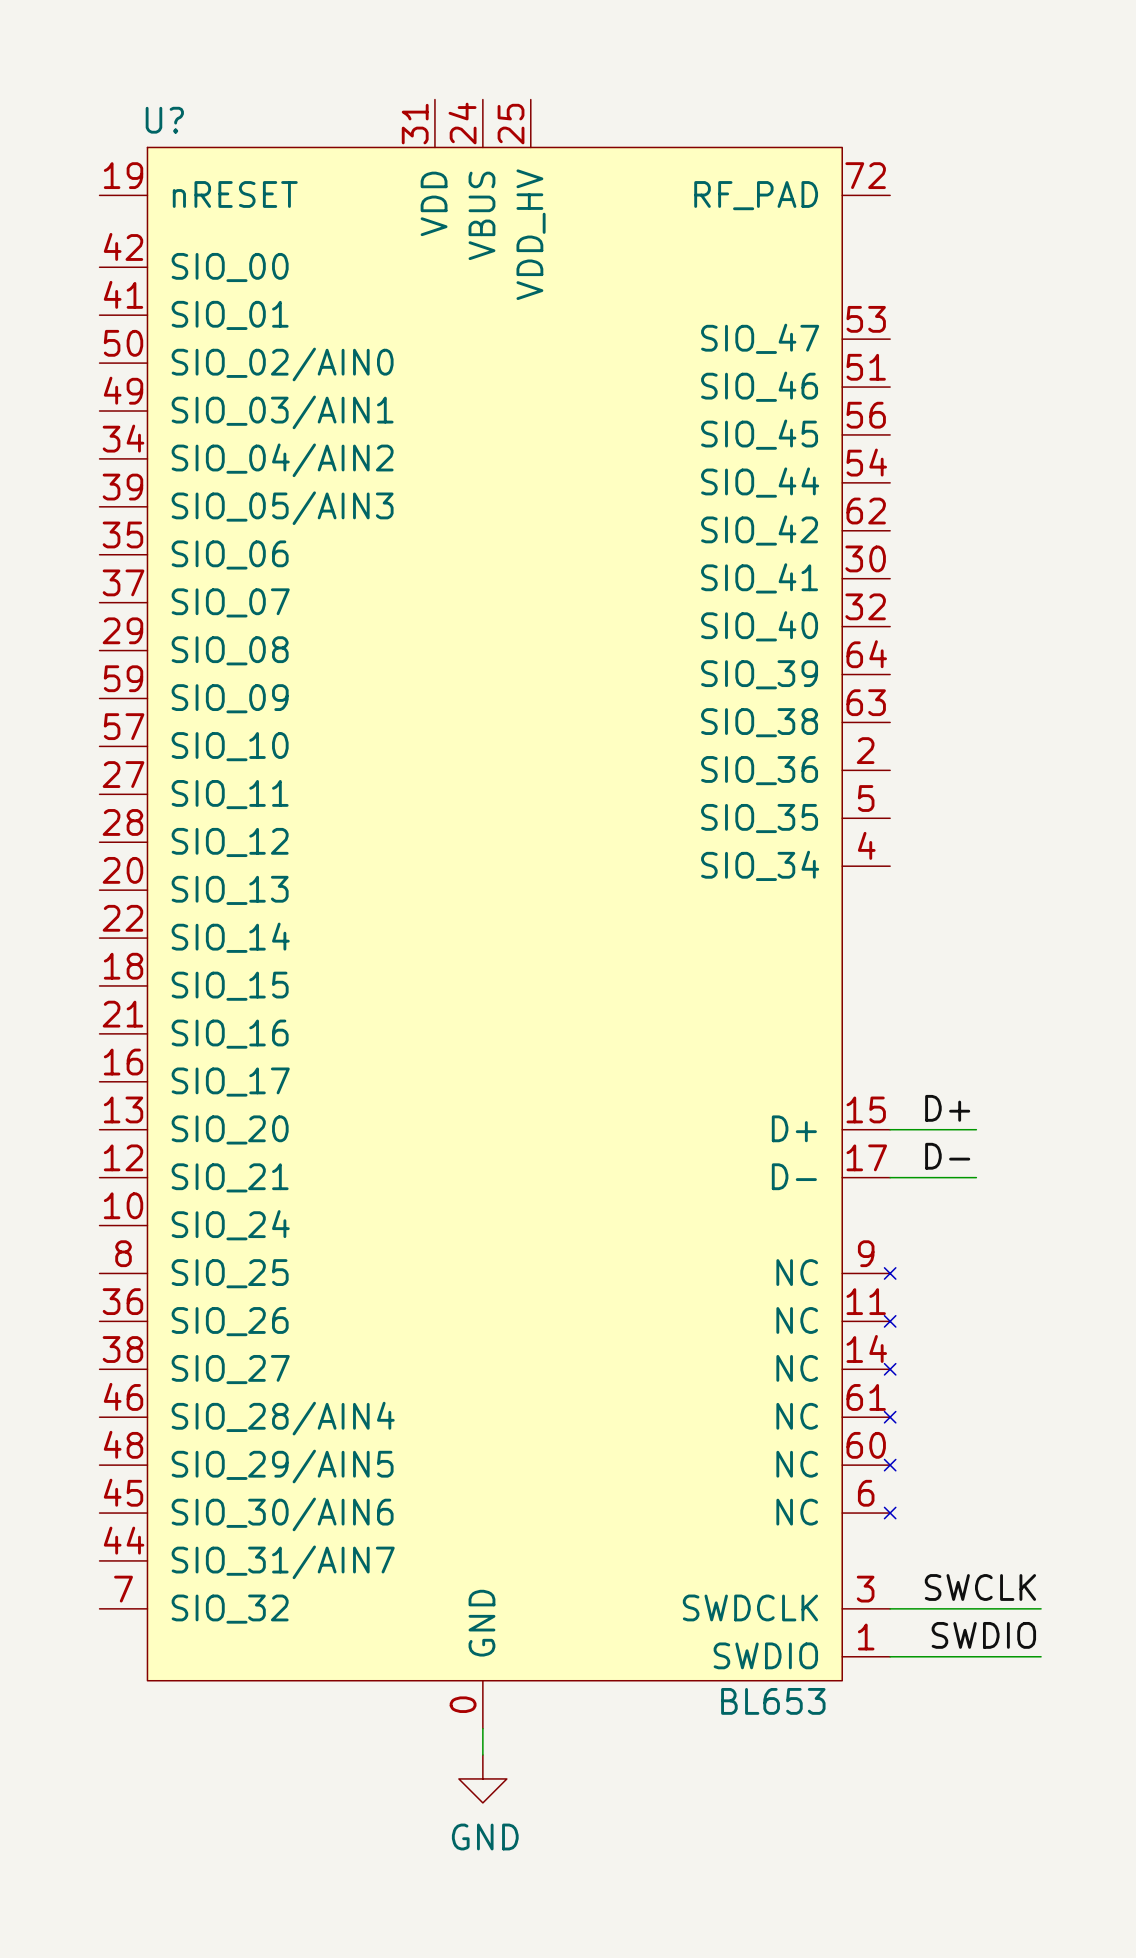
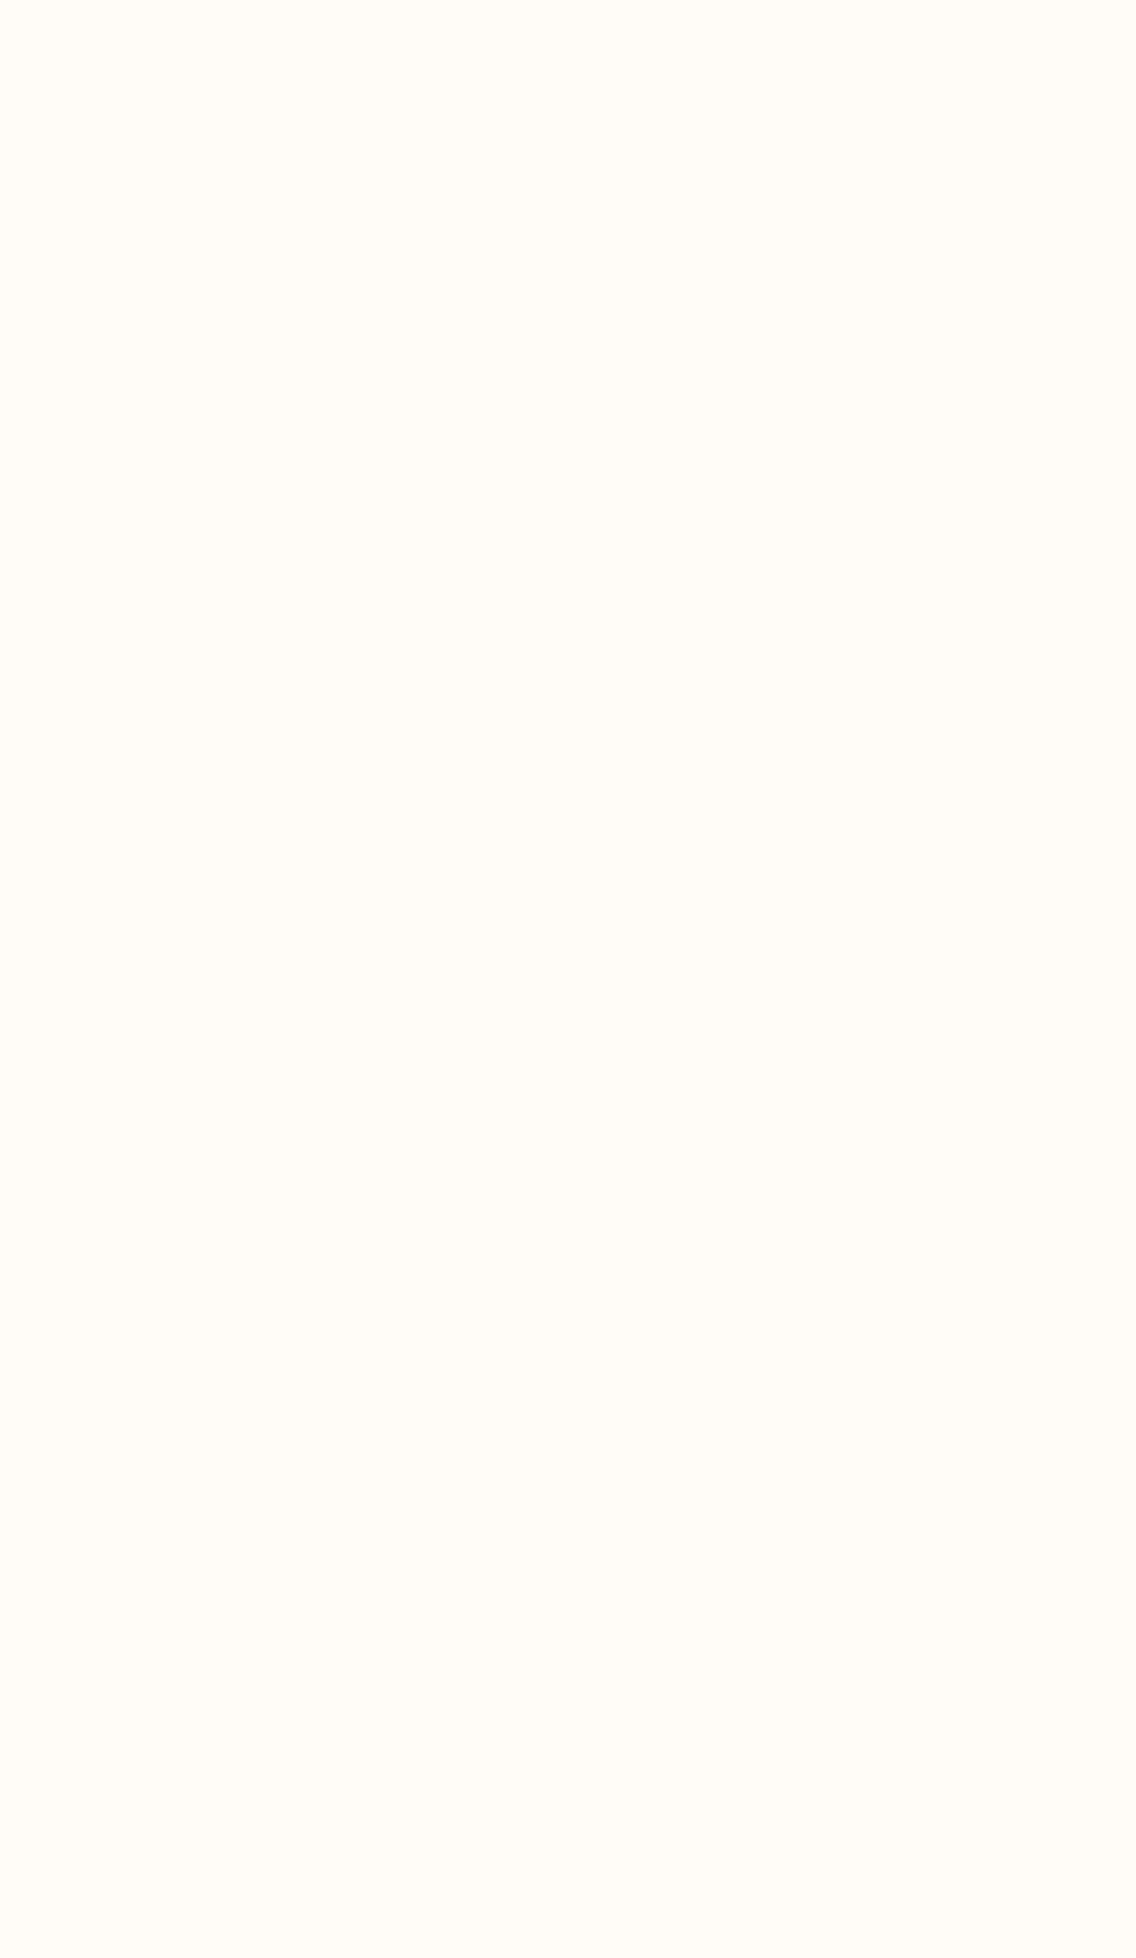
U?: BL653 (497, 914) -> none
label: D+ (947, 1108) -> none
wire: (890, 1129) (976, 1129) -> none
label: D- (947, 1156) -> none
wire: (890, 1177) (976, 1177) -> none
label: SWCLK (980, 1587) -> none
wire: (890, 1608) (1041, 1608) -> none
label: SWDIO (983, 1635) -> none
wire: (890, 1656) (1041, 1656) -> none
wire: (482, 1728) (482, 1755) -> none
power symbol: GND (482, 1778) -> none

